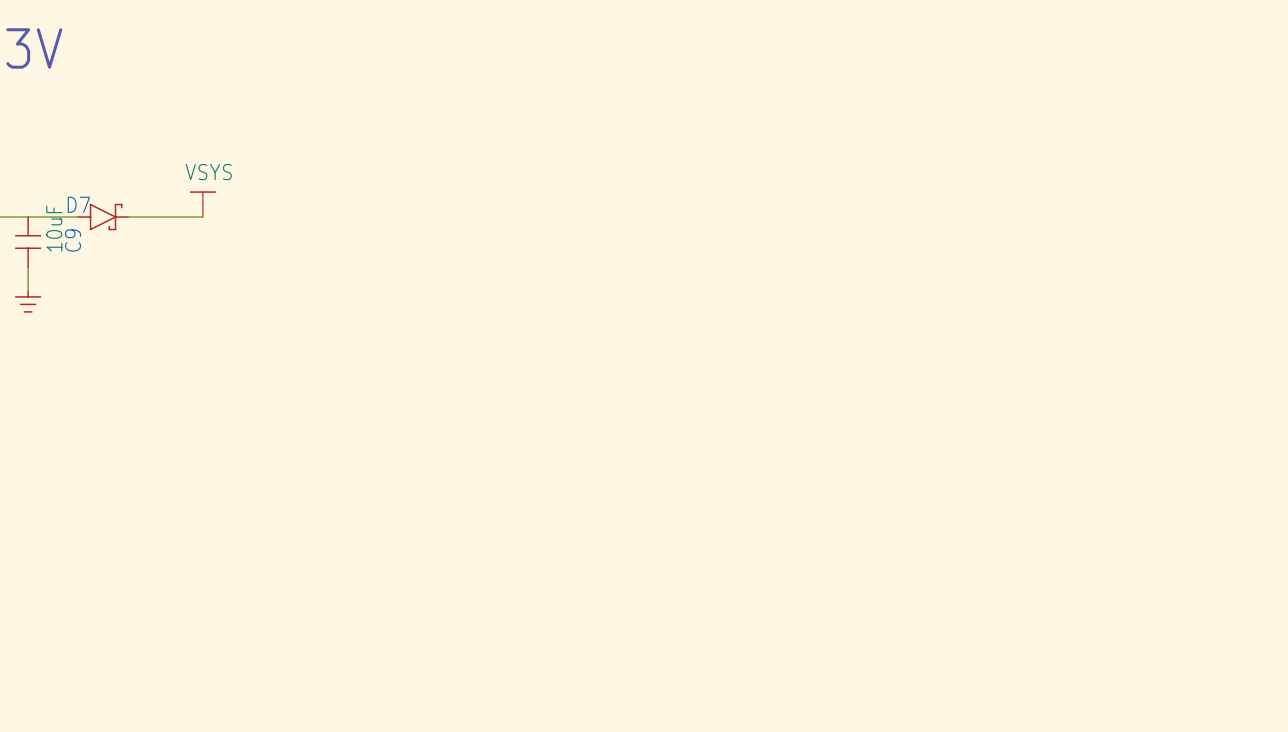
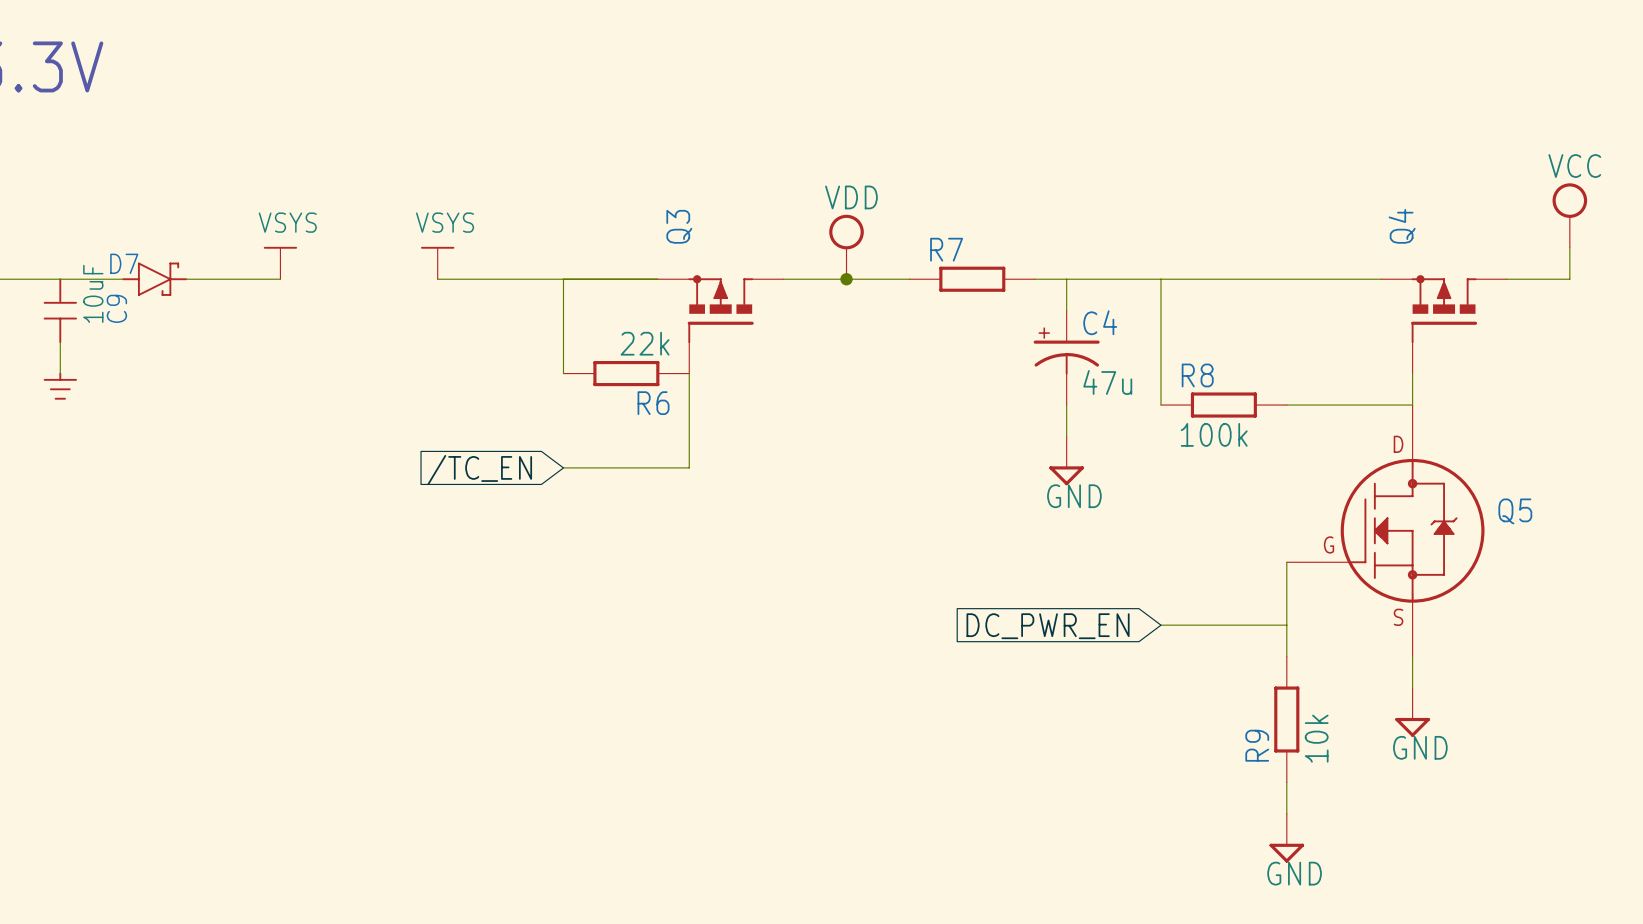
power symbol: none -> VCC (1569, 215)
power symbol: none -> VDD (846, 246)
wire: none -> (1569, 247) (1569, 279) (1506, 279)
power symbol: none -> VSYS (437, 263)
wire: none -> (437, 279) (657, 279)
wire: none -> (563, 279) (563, 373)
wire: none -> (783, 279) (909, 279)
junction: none -> (846, 279)
R7: none -> (972, 279)
wire: none -> (1035, 279) (1381, 279)
wire: none -> (1066, 279) (1066, 310)
wire: none -> (1161, 279) (1161, 405)
Q3: none -> (720, 324)
Q4: none -> (1444, 324)
C4: none -> 47u (1066, 357)
R6: none -> 22k (626, 373)
wire: none -> (689, 373) (689, 467) (563, 467)
wire: none -> (1412, 373) (1412, 405) (1286, 405)
wire: none -> (1066, 405) (1066, 436)
R8: none -> 100k (1223, 405)
power symbol: none -> GND (1066, 460)
global label: none -> /TC_EN (479, 470)
Q5: none -> (1385, 530)
wire: none -> (1286, 562) (1286, 656)
wire: none -> (1161, 625) (1286, 625)
global label: none -> DC_PWR_EN (1048, 626)
wire: none -> (1412, 656) (1412, 688)
power symbol: none -> GND (1412, 712)
R9: none -> 10k (1286, 719)
wire: none -> (1286, 782) (1286, 813)
power symbol: none -> GND (1286, 838)

